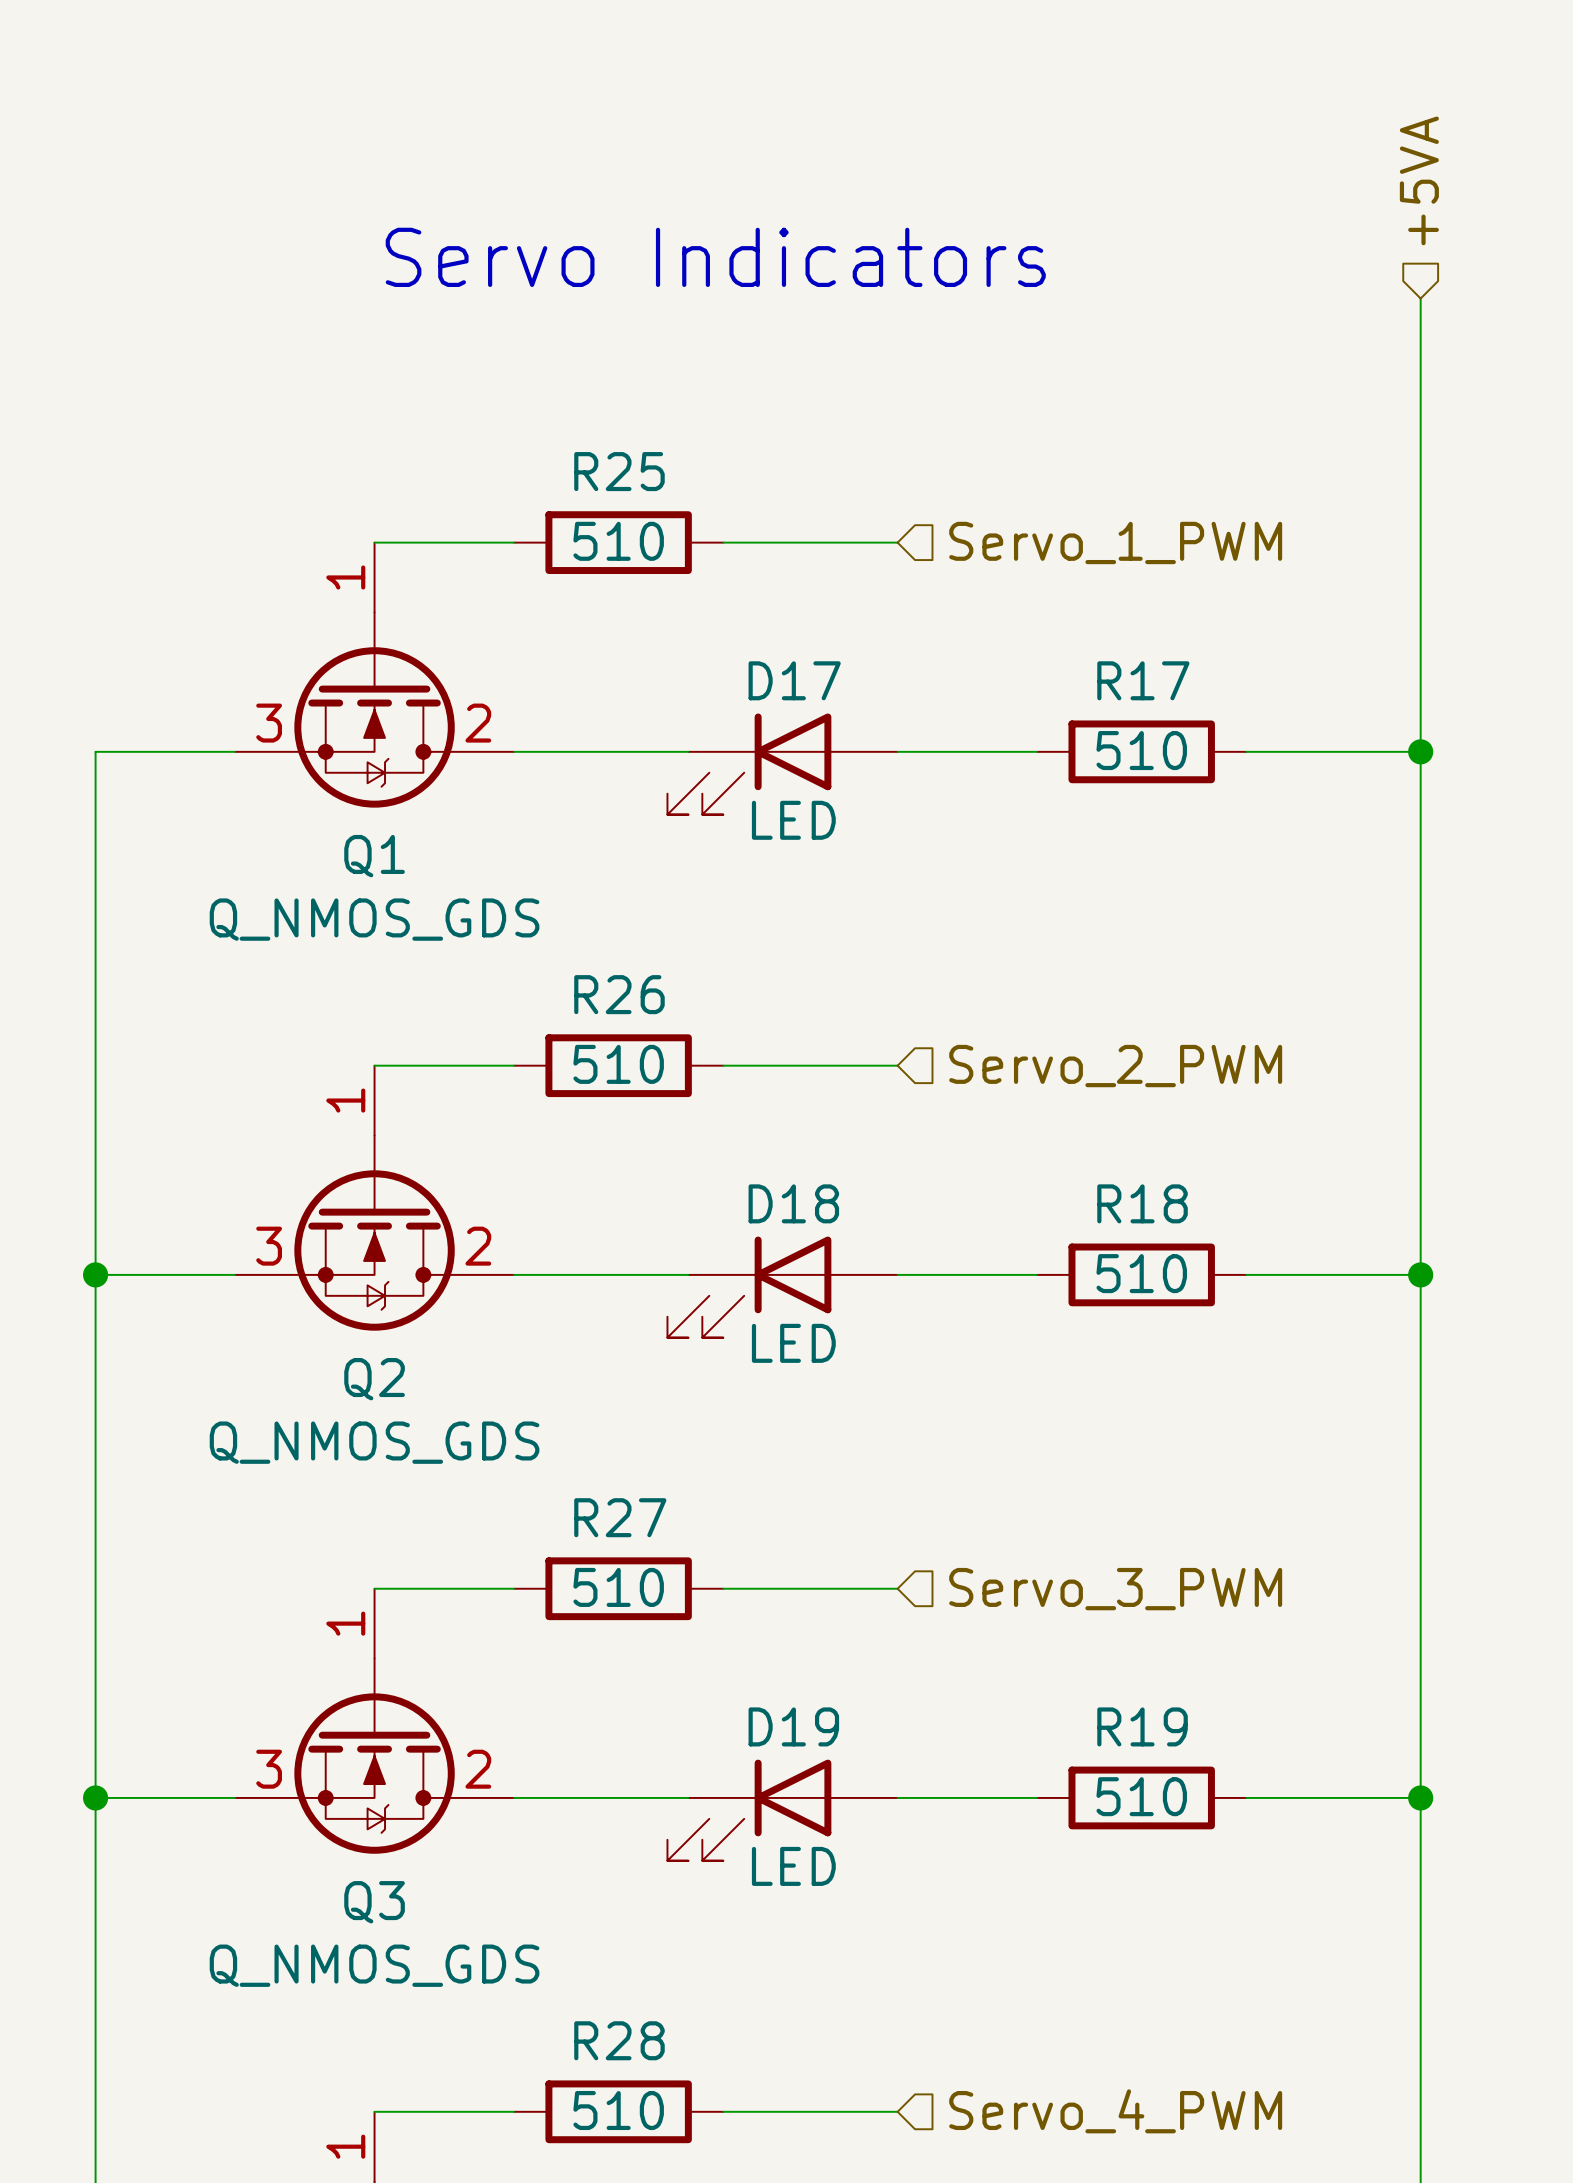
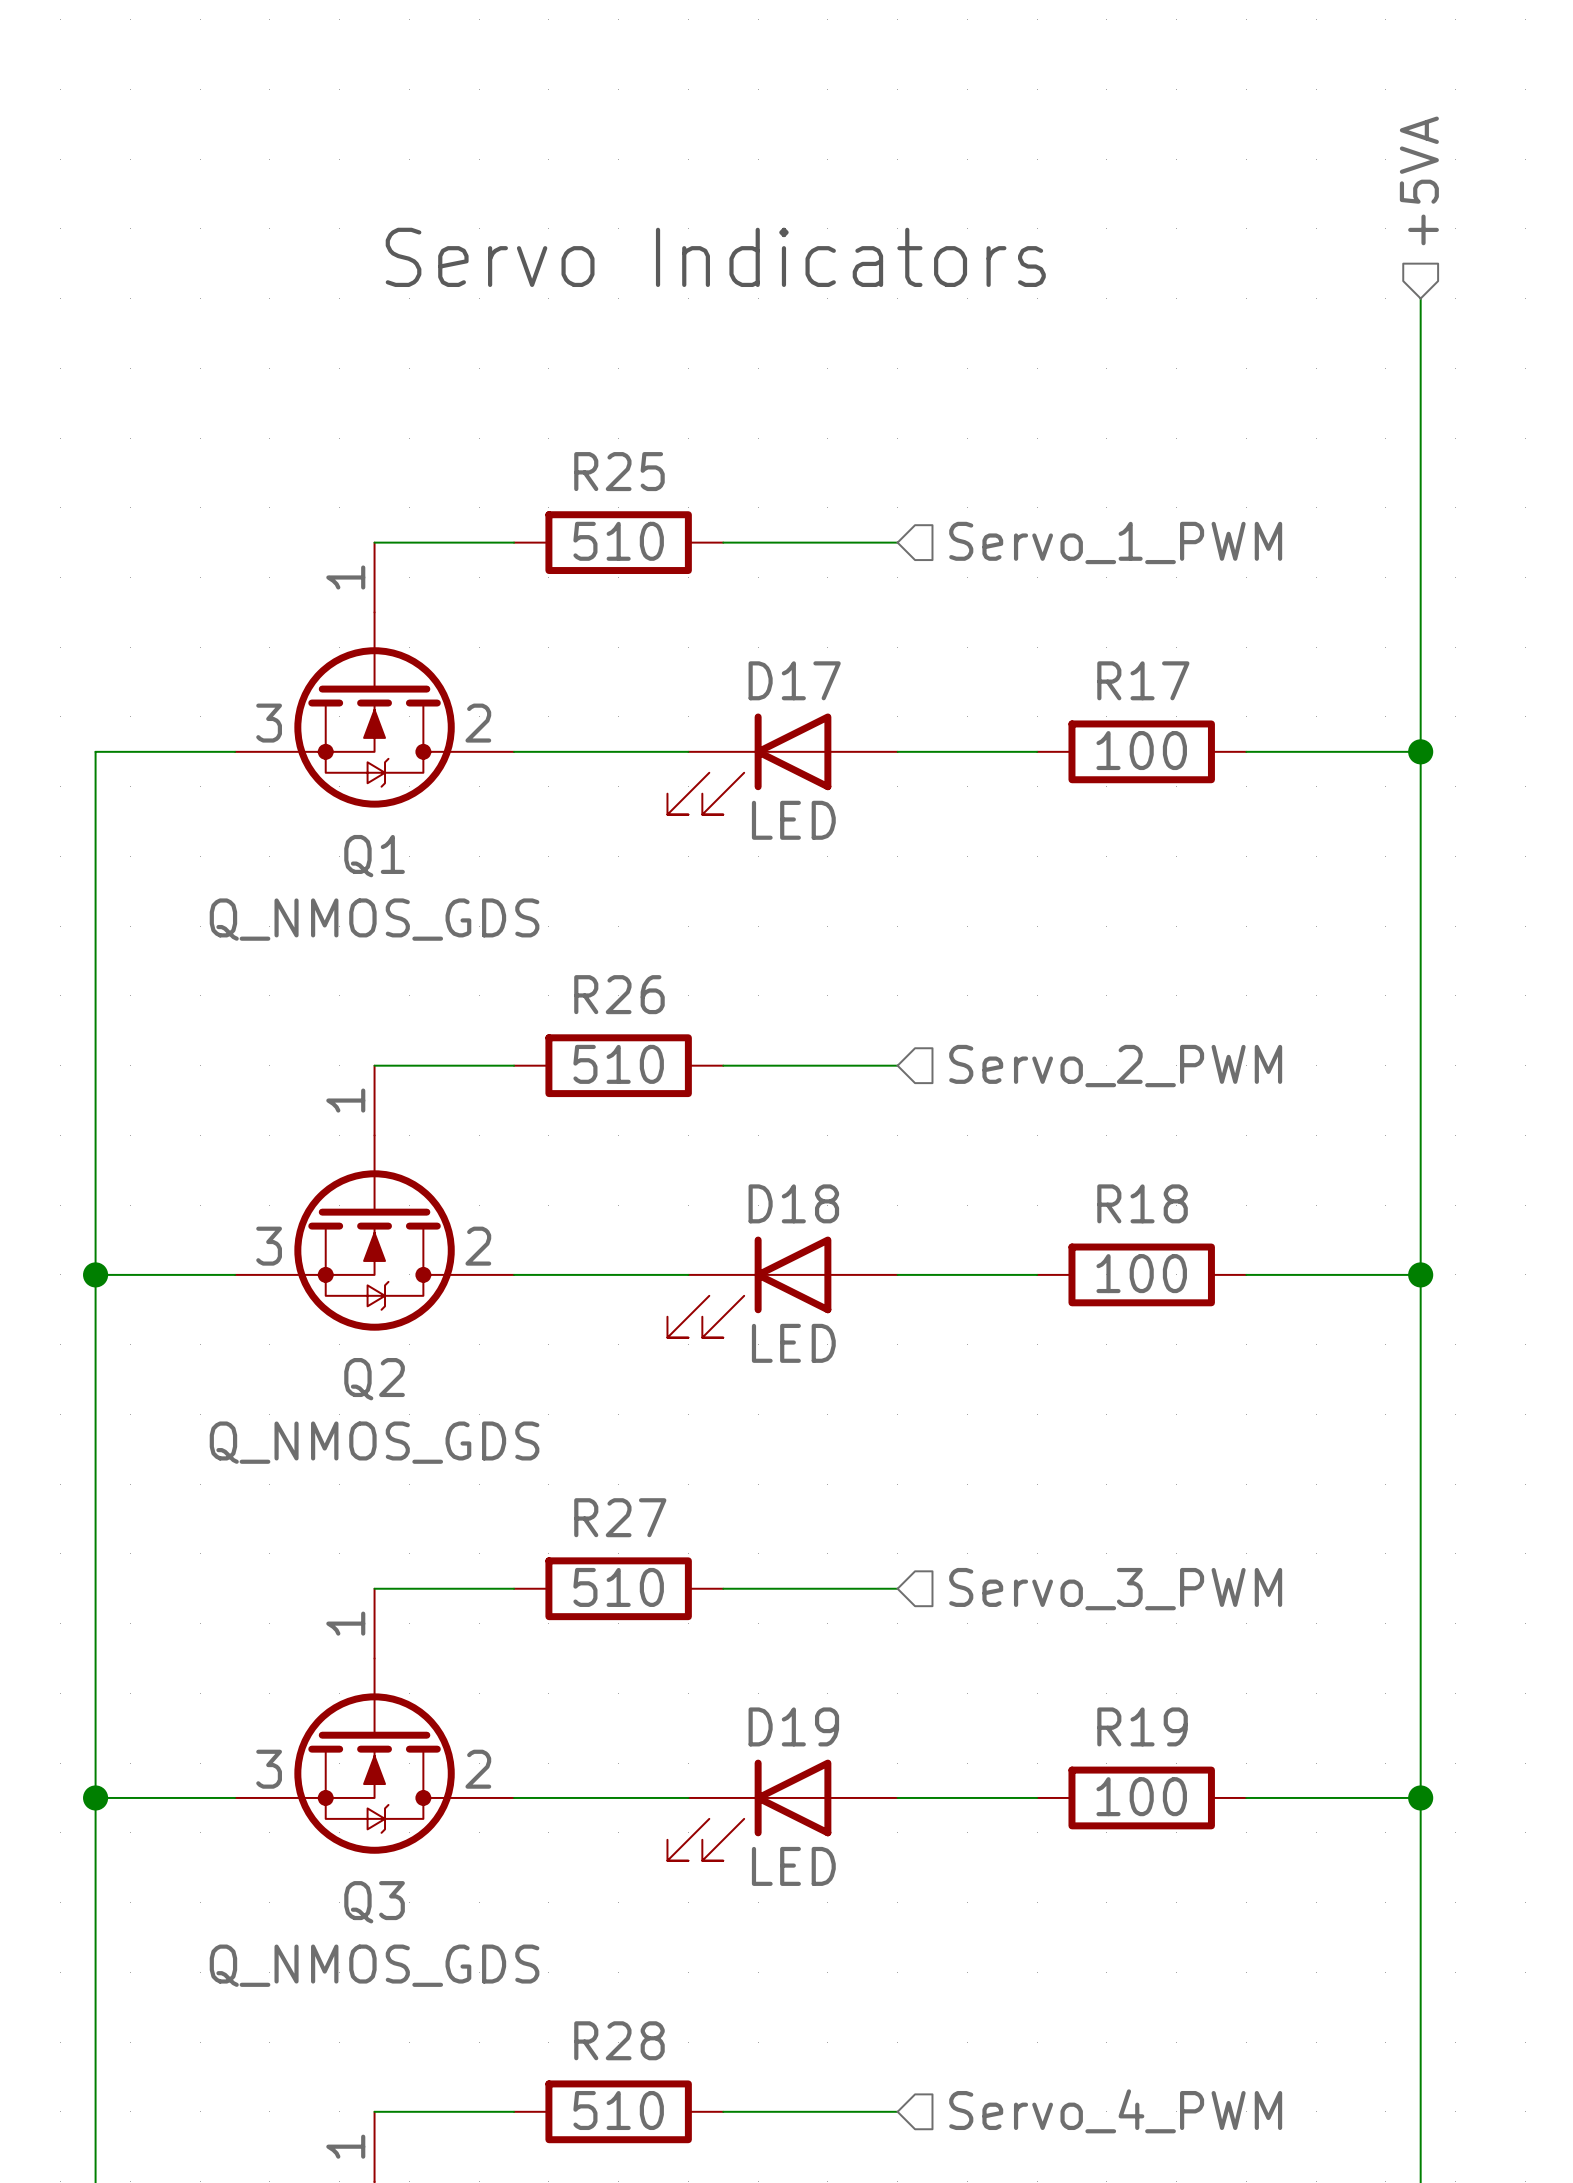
R17 value: 510 (1141, 750) -> 100 (1141, 750)
R18 value: 510 (1141, 1273) -> 100 (1141, 1273)
R19 value: 510 (1141, 1796) -> 100 (1141, 1796)

